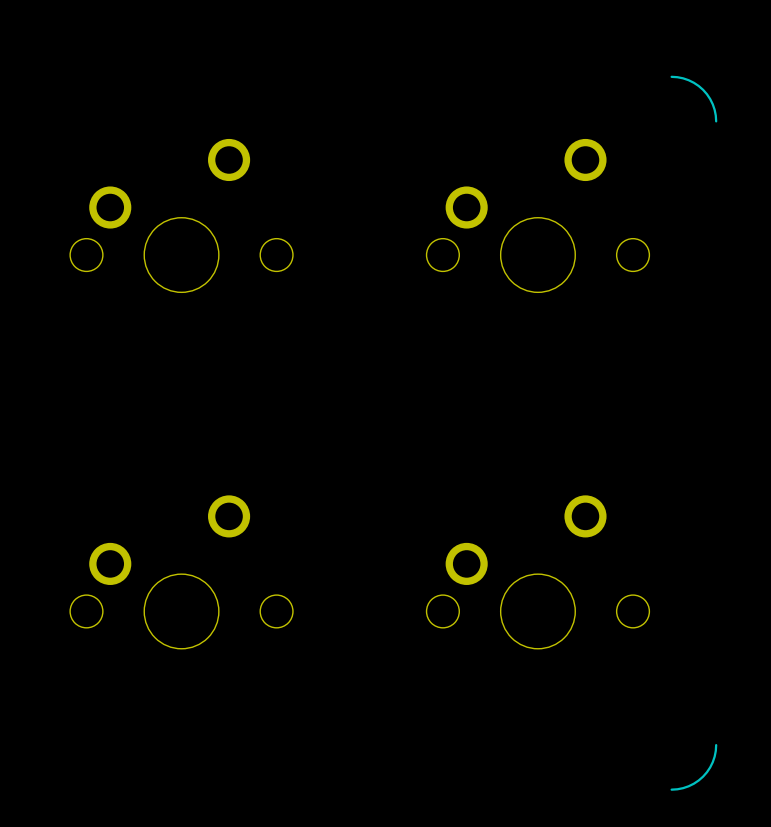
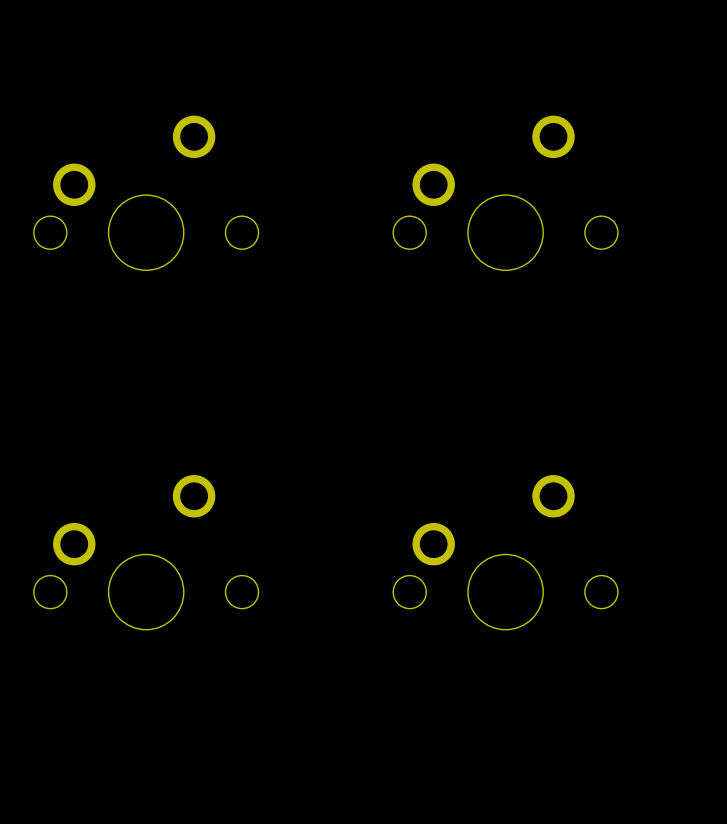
line: (671, 76) (688, 80) (703, 89) (712, 104) (716, 121) -> none
line: (716, 745) (712, 762) (703, 776) (688, 786) (671, 789) -> none

